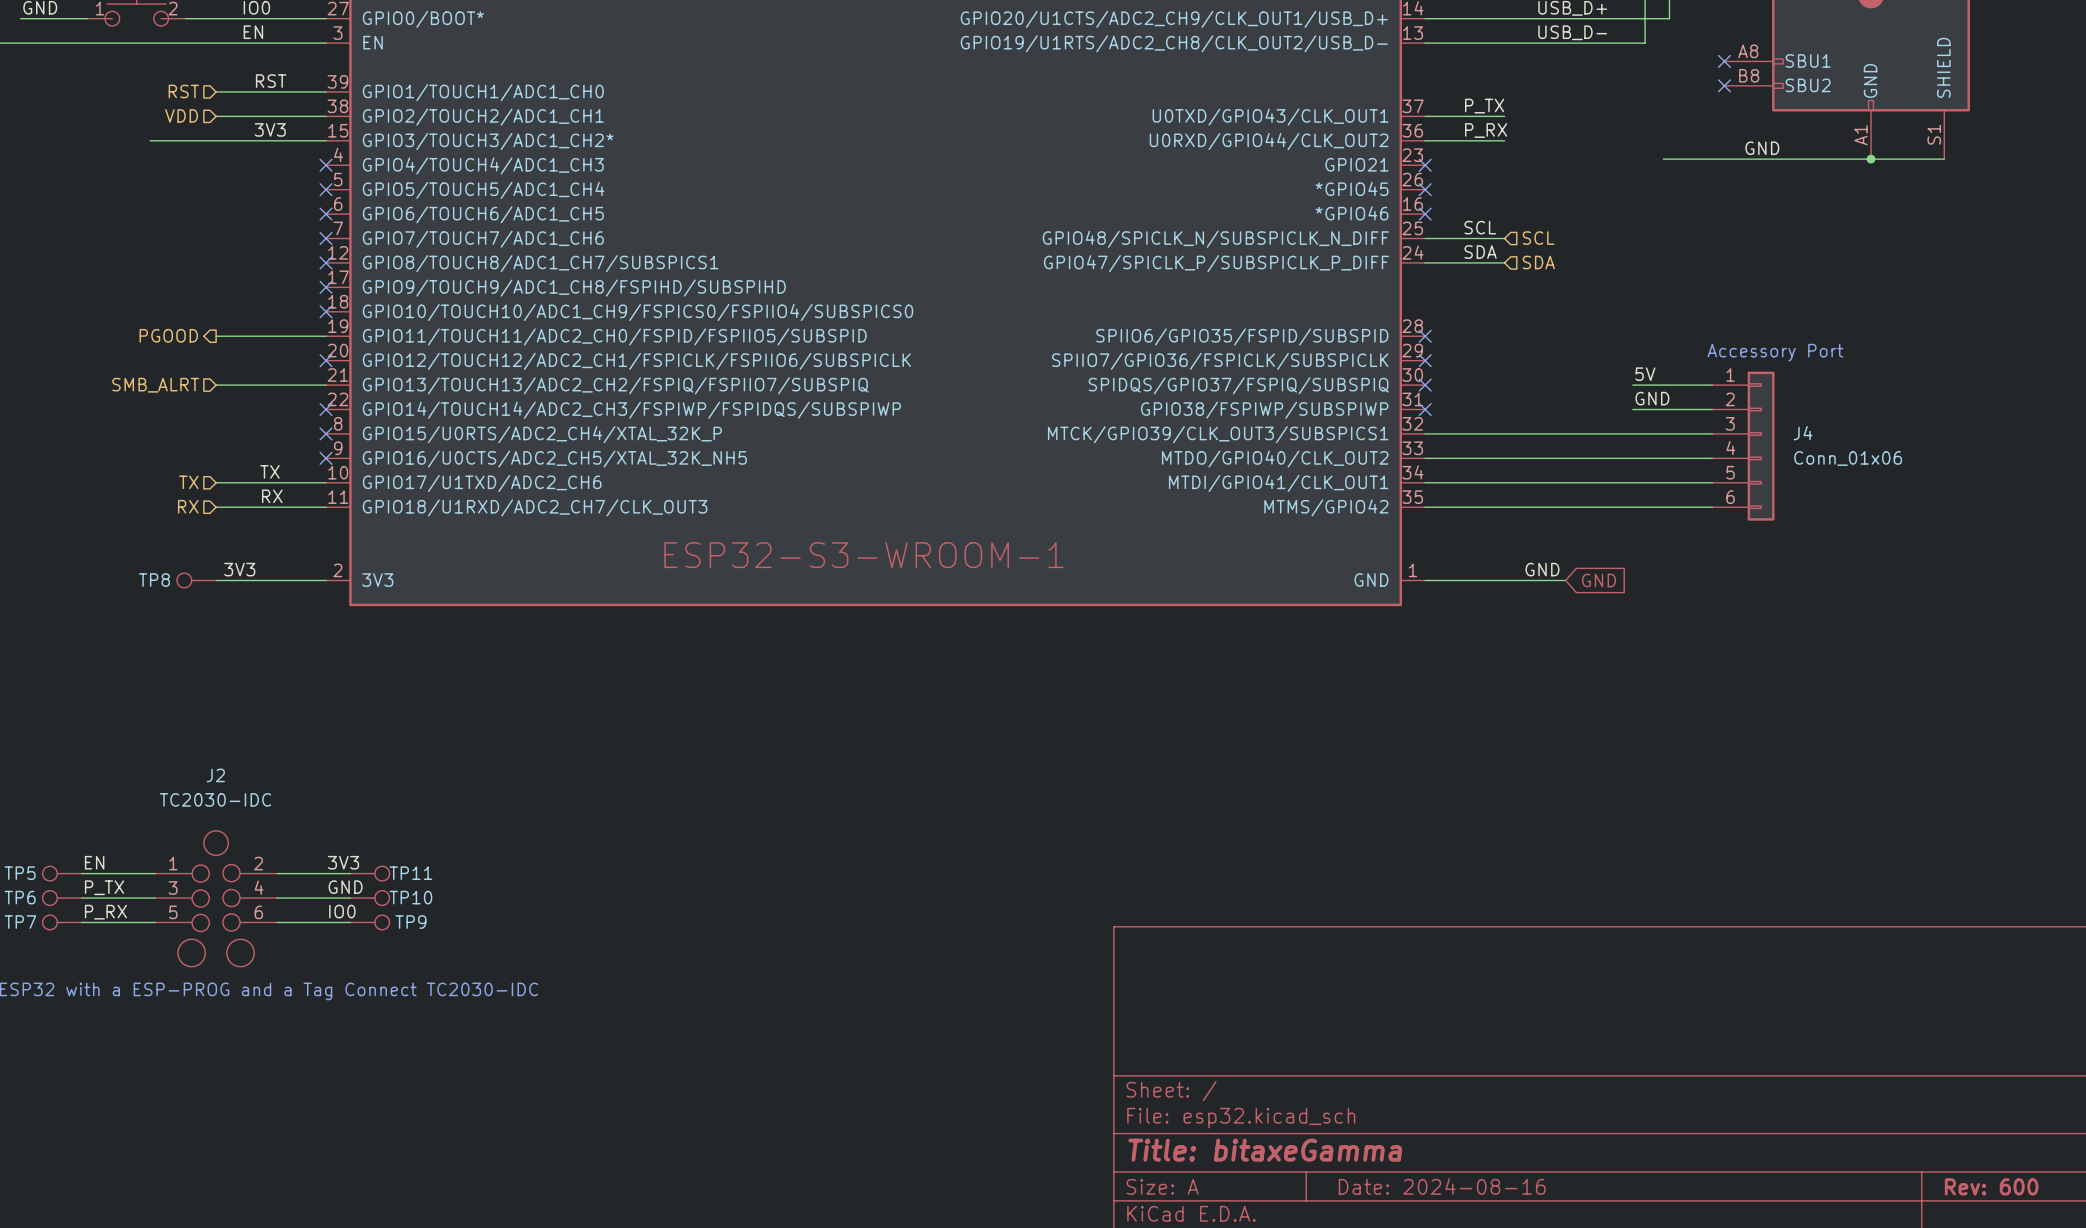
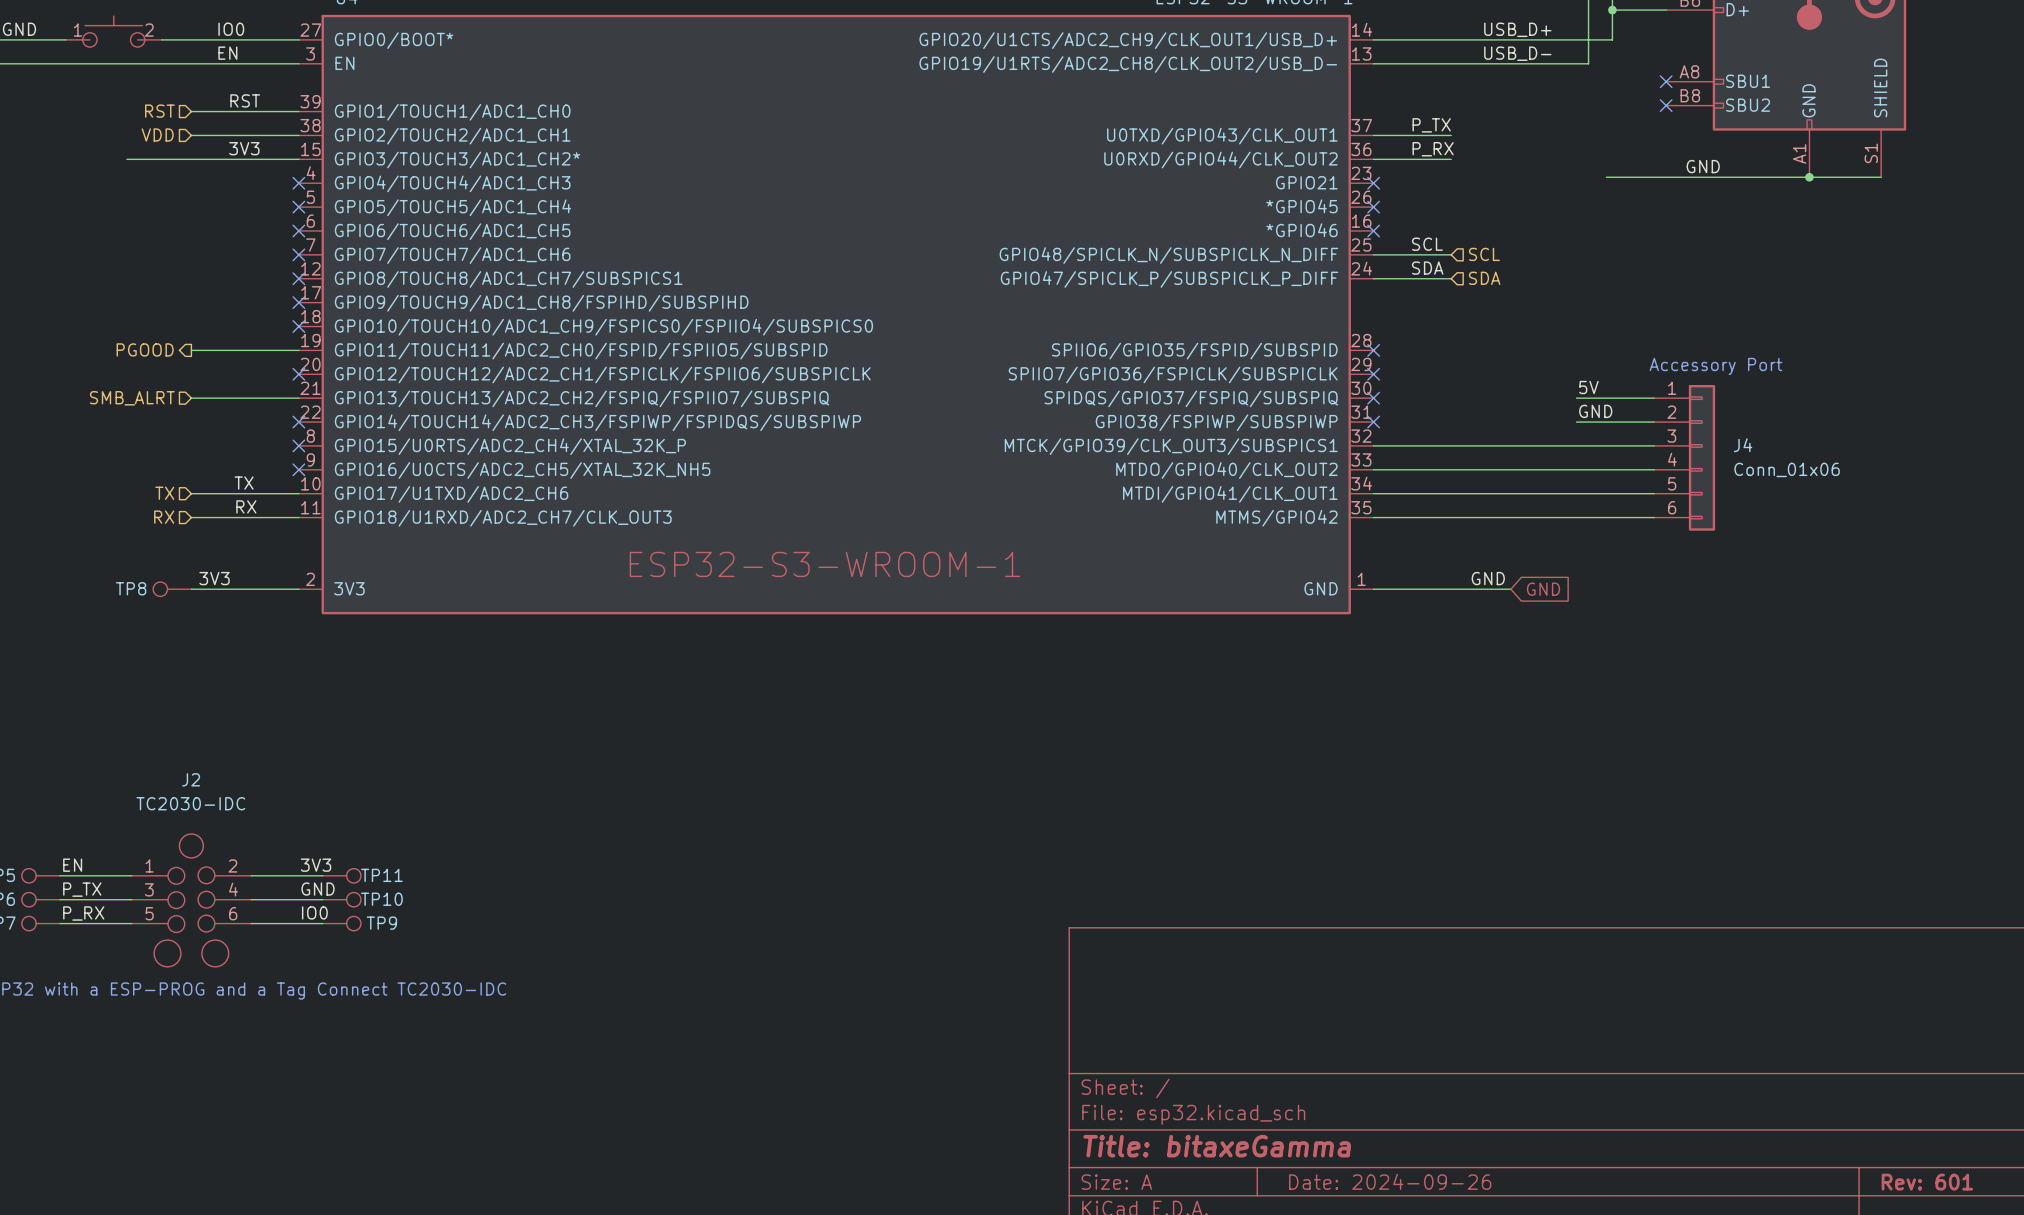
title block: Date: 2024-08-16 (1442, 1186) -> Date: 2024-09-26 (1390, 1181)
title block: Rev: 600 (1991, 1186) -> Rev: 601 (1927, 1182)

